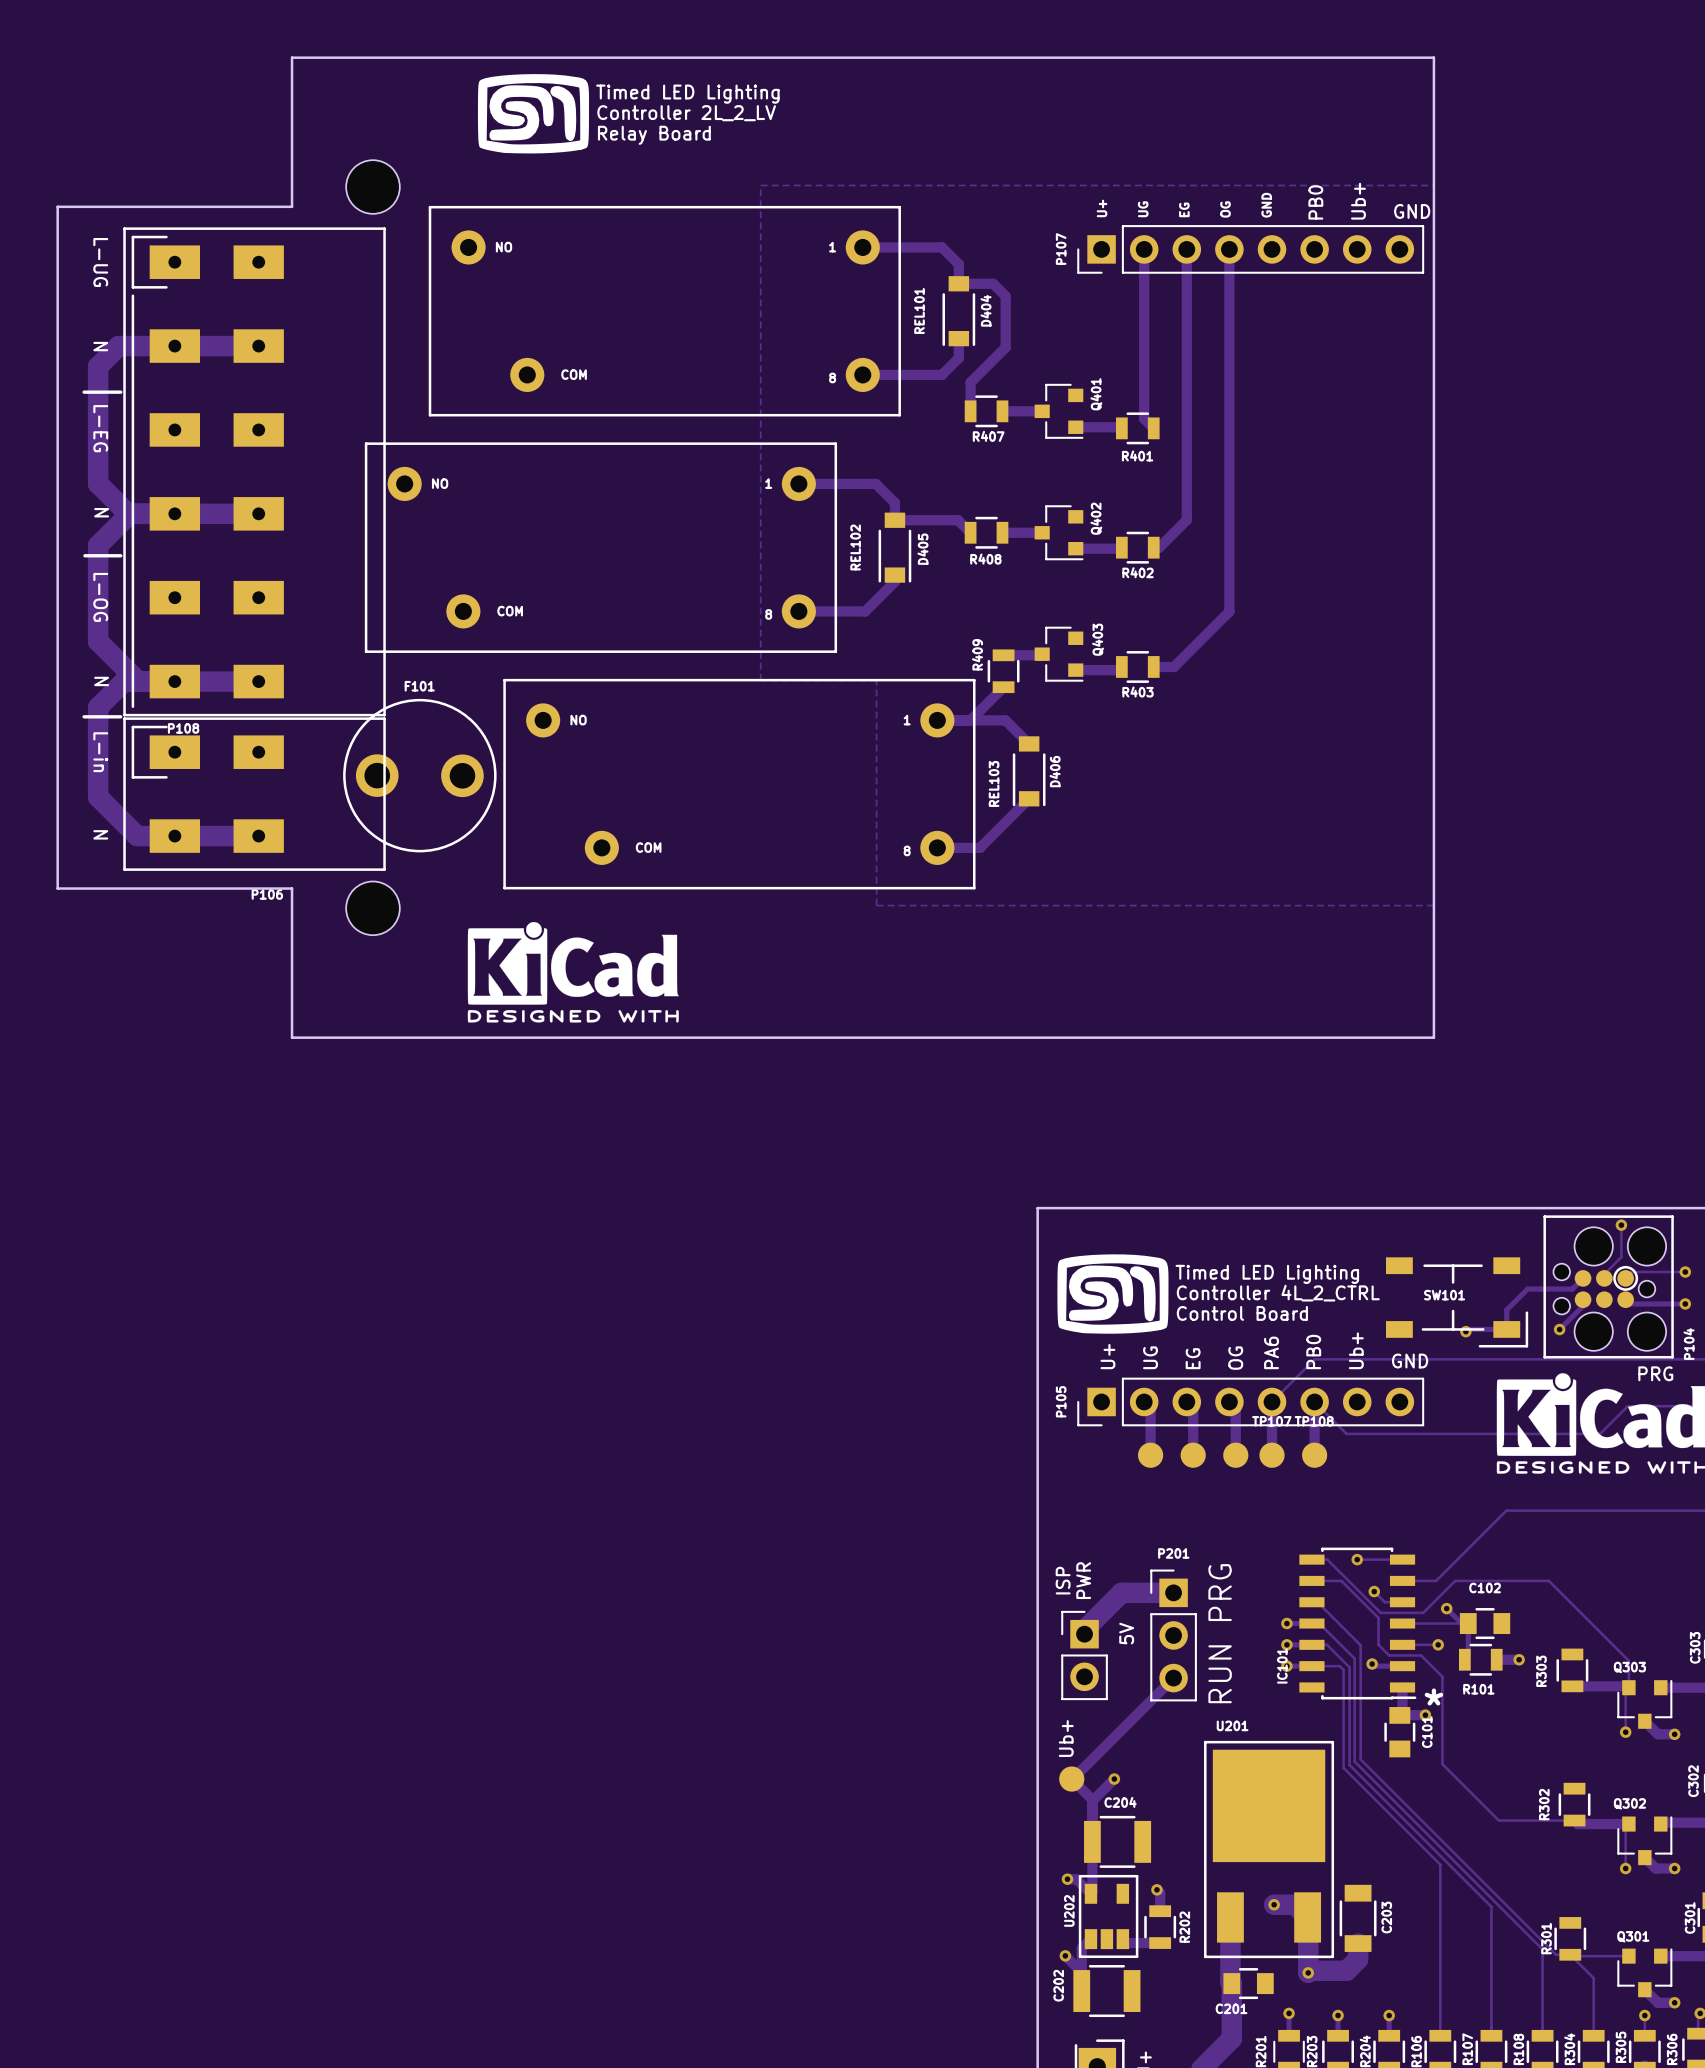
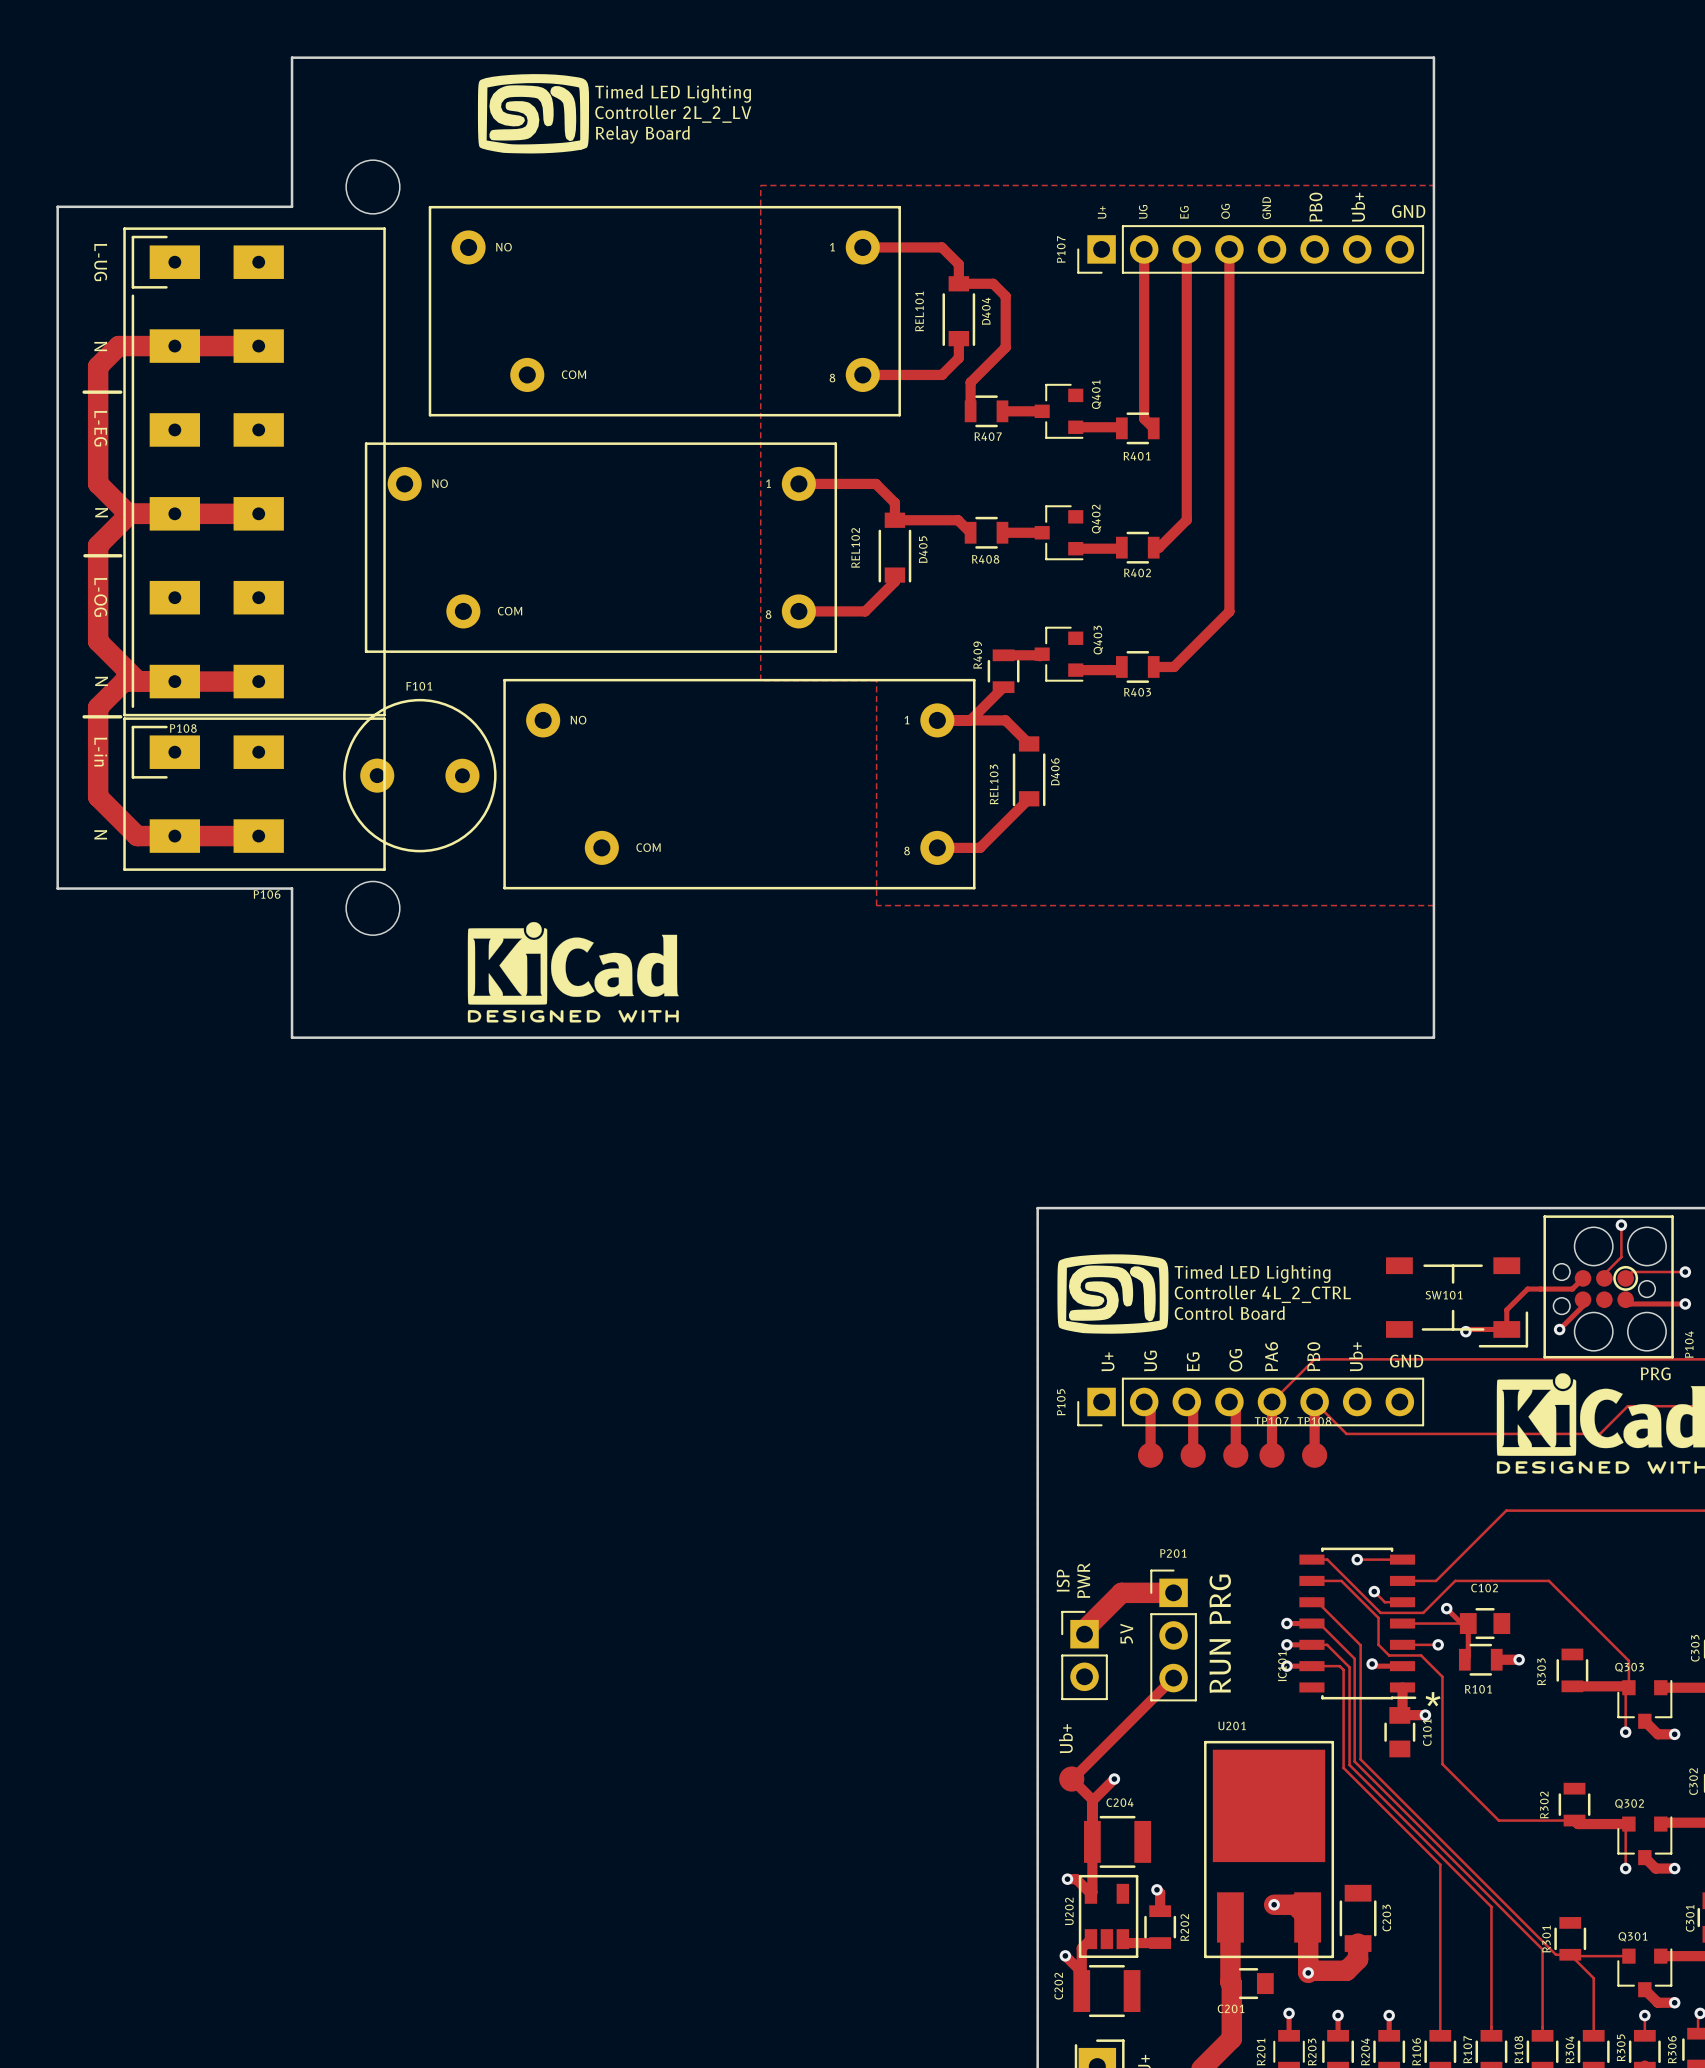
F101 footprint: [343, 698, 497, 853] -> [343, 698, 497, 853]

